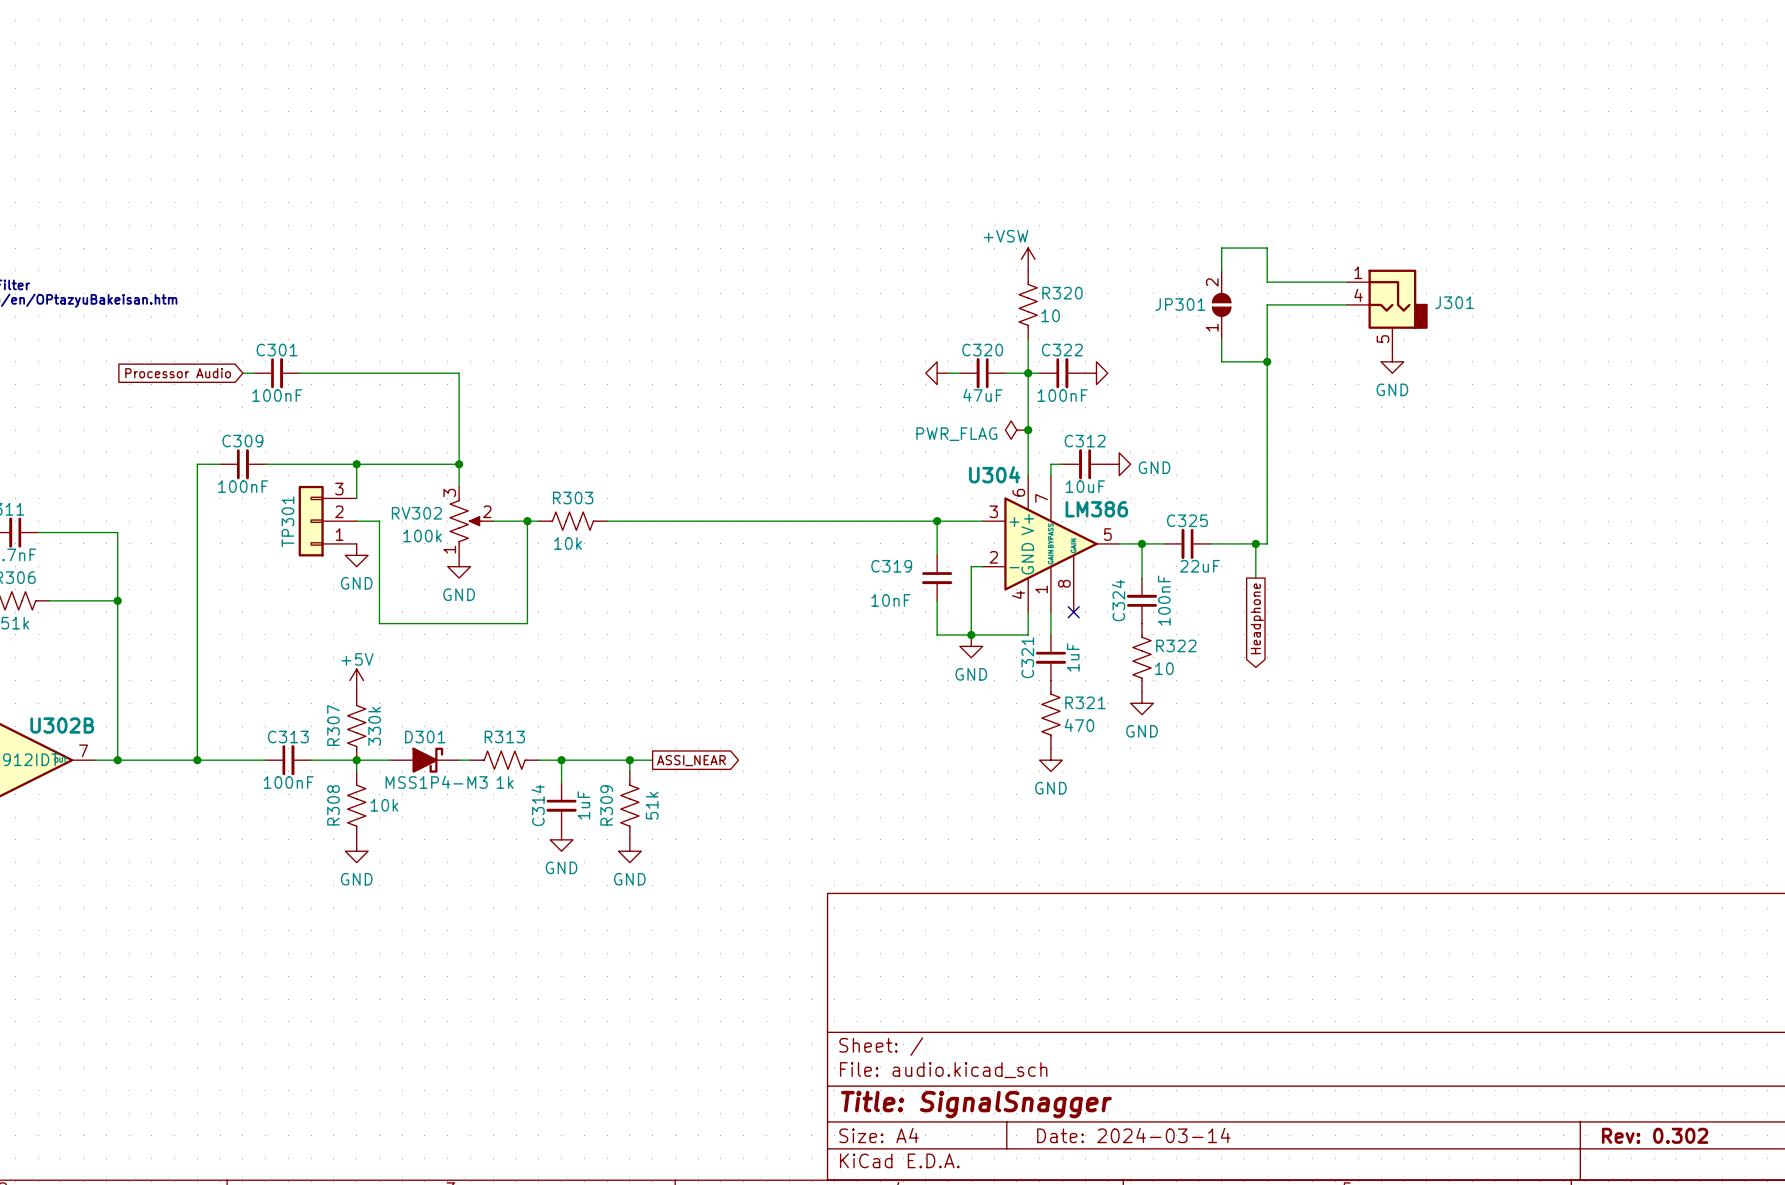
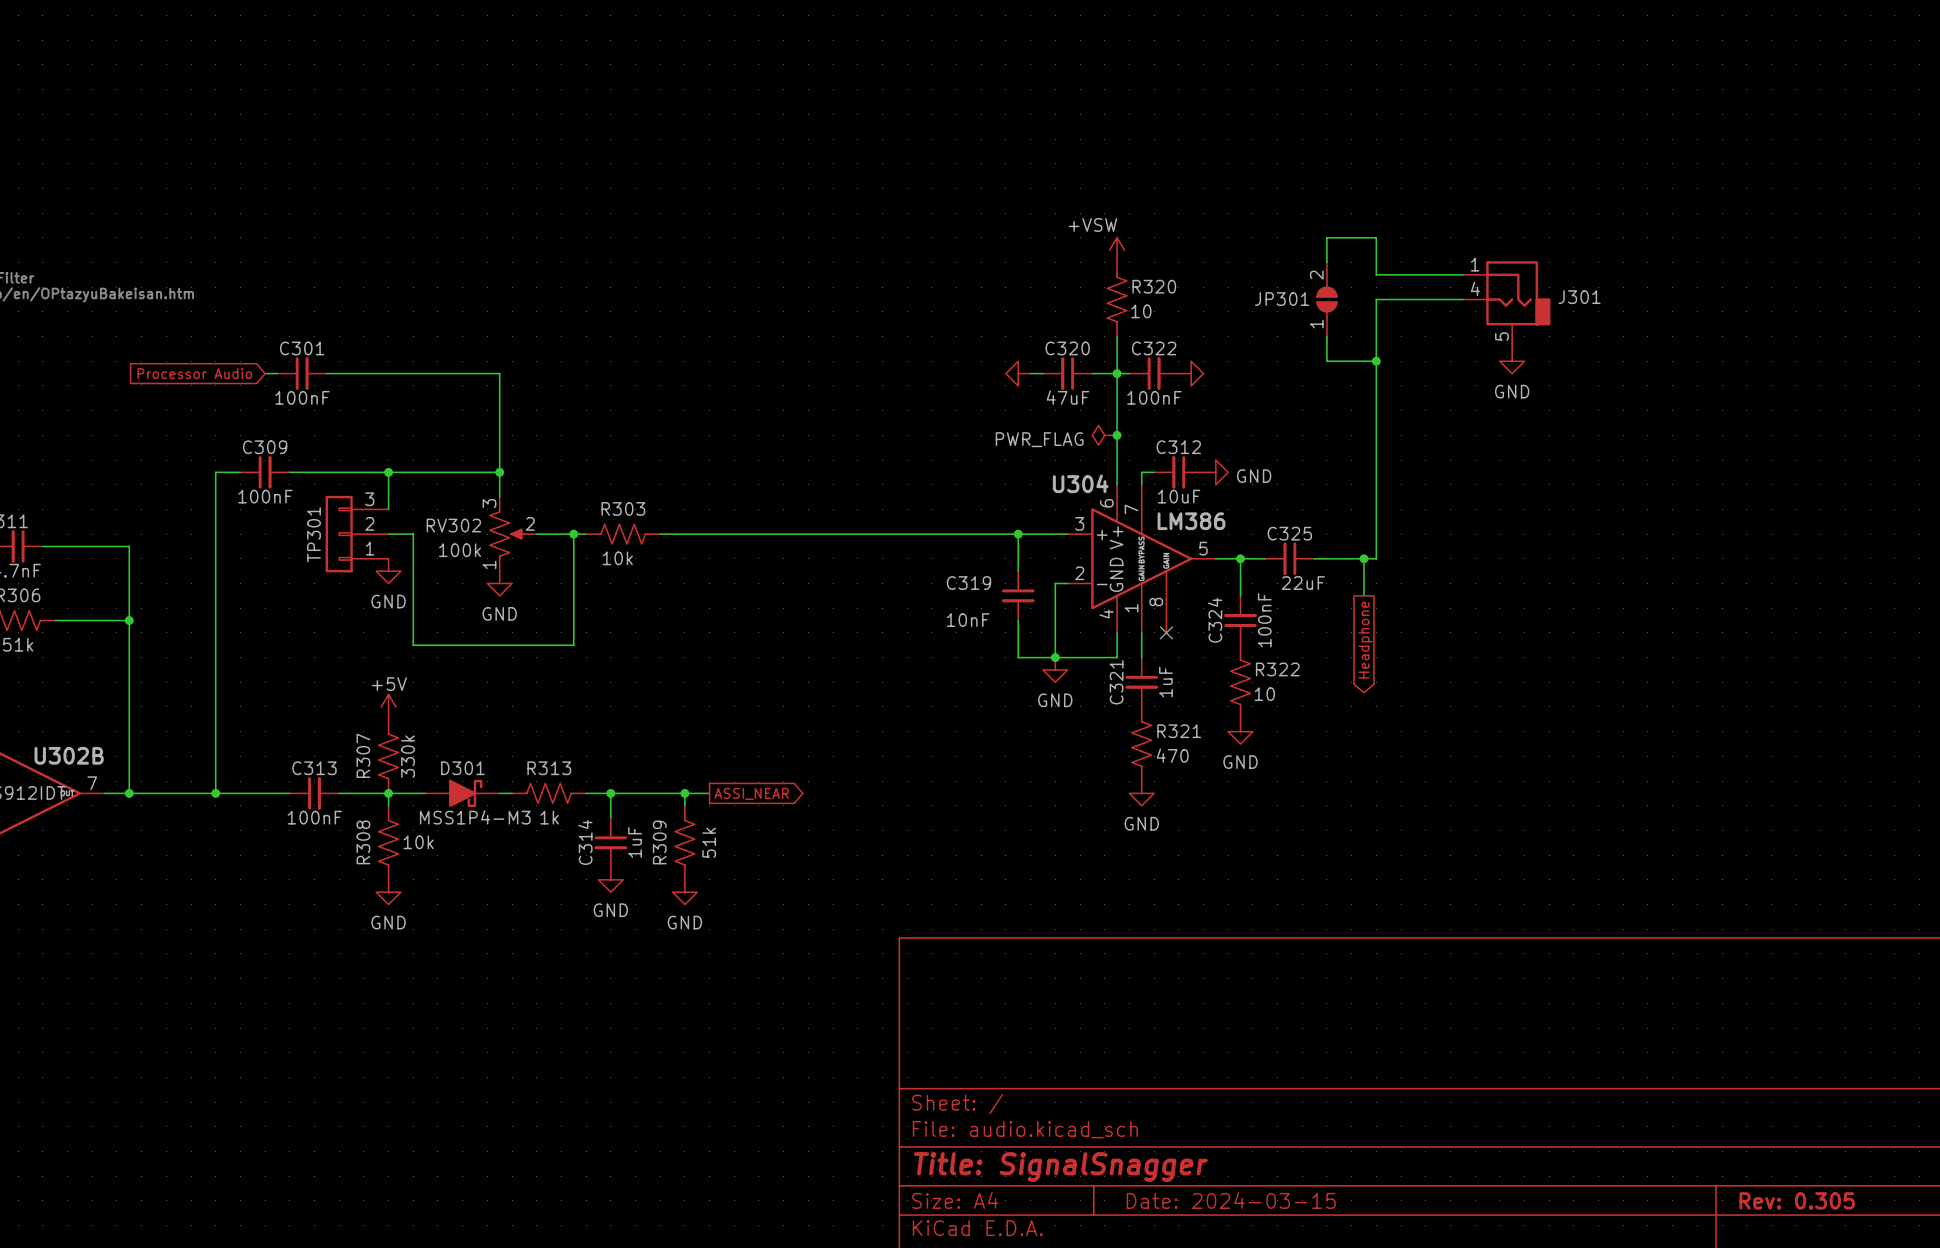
title block: Date: 2024-03-14 (1133, 1135) -> Date: 2024-03-15 (1231, 1200)
title block: Rev: 0.302 (1655, 1135) -> Rev: 0.305 (1797, 1200)

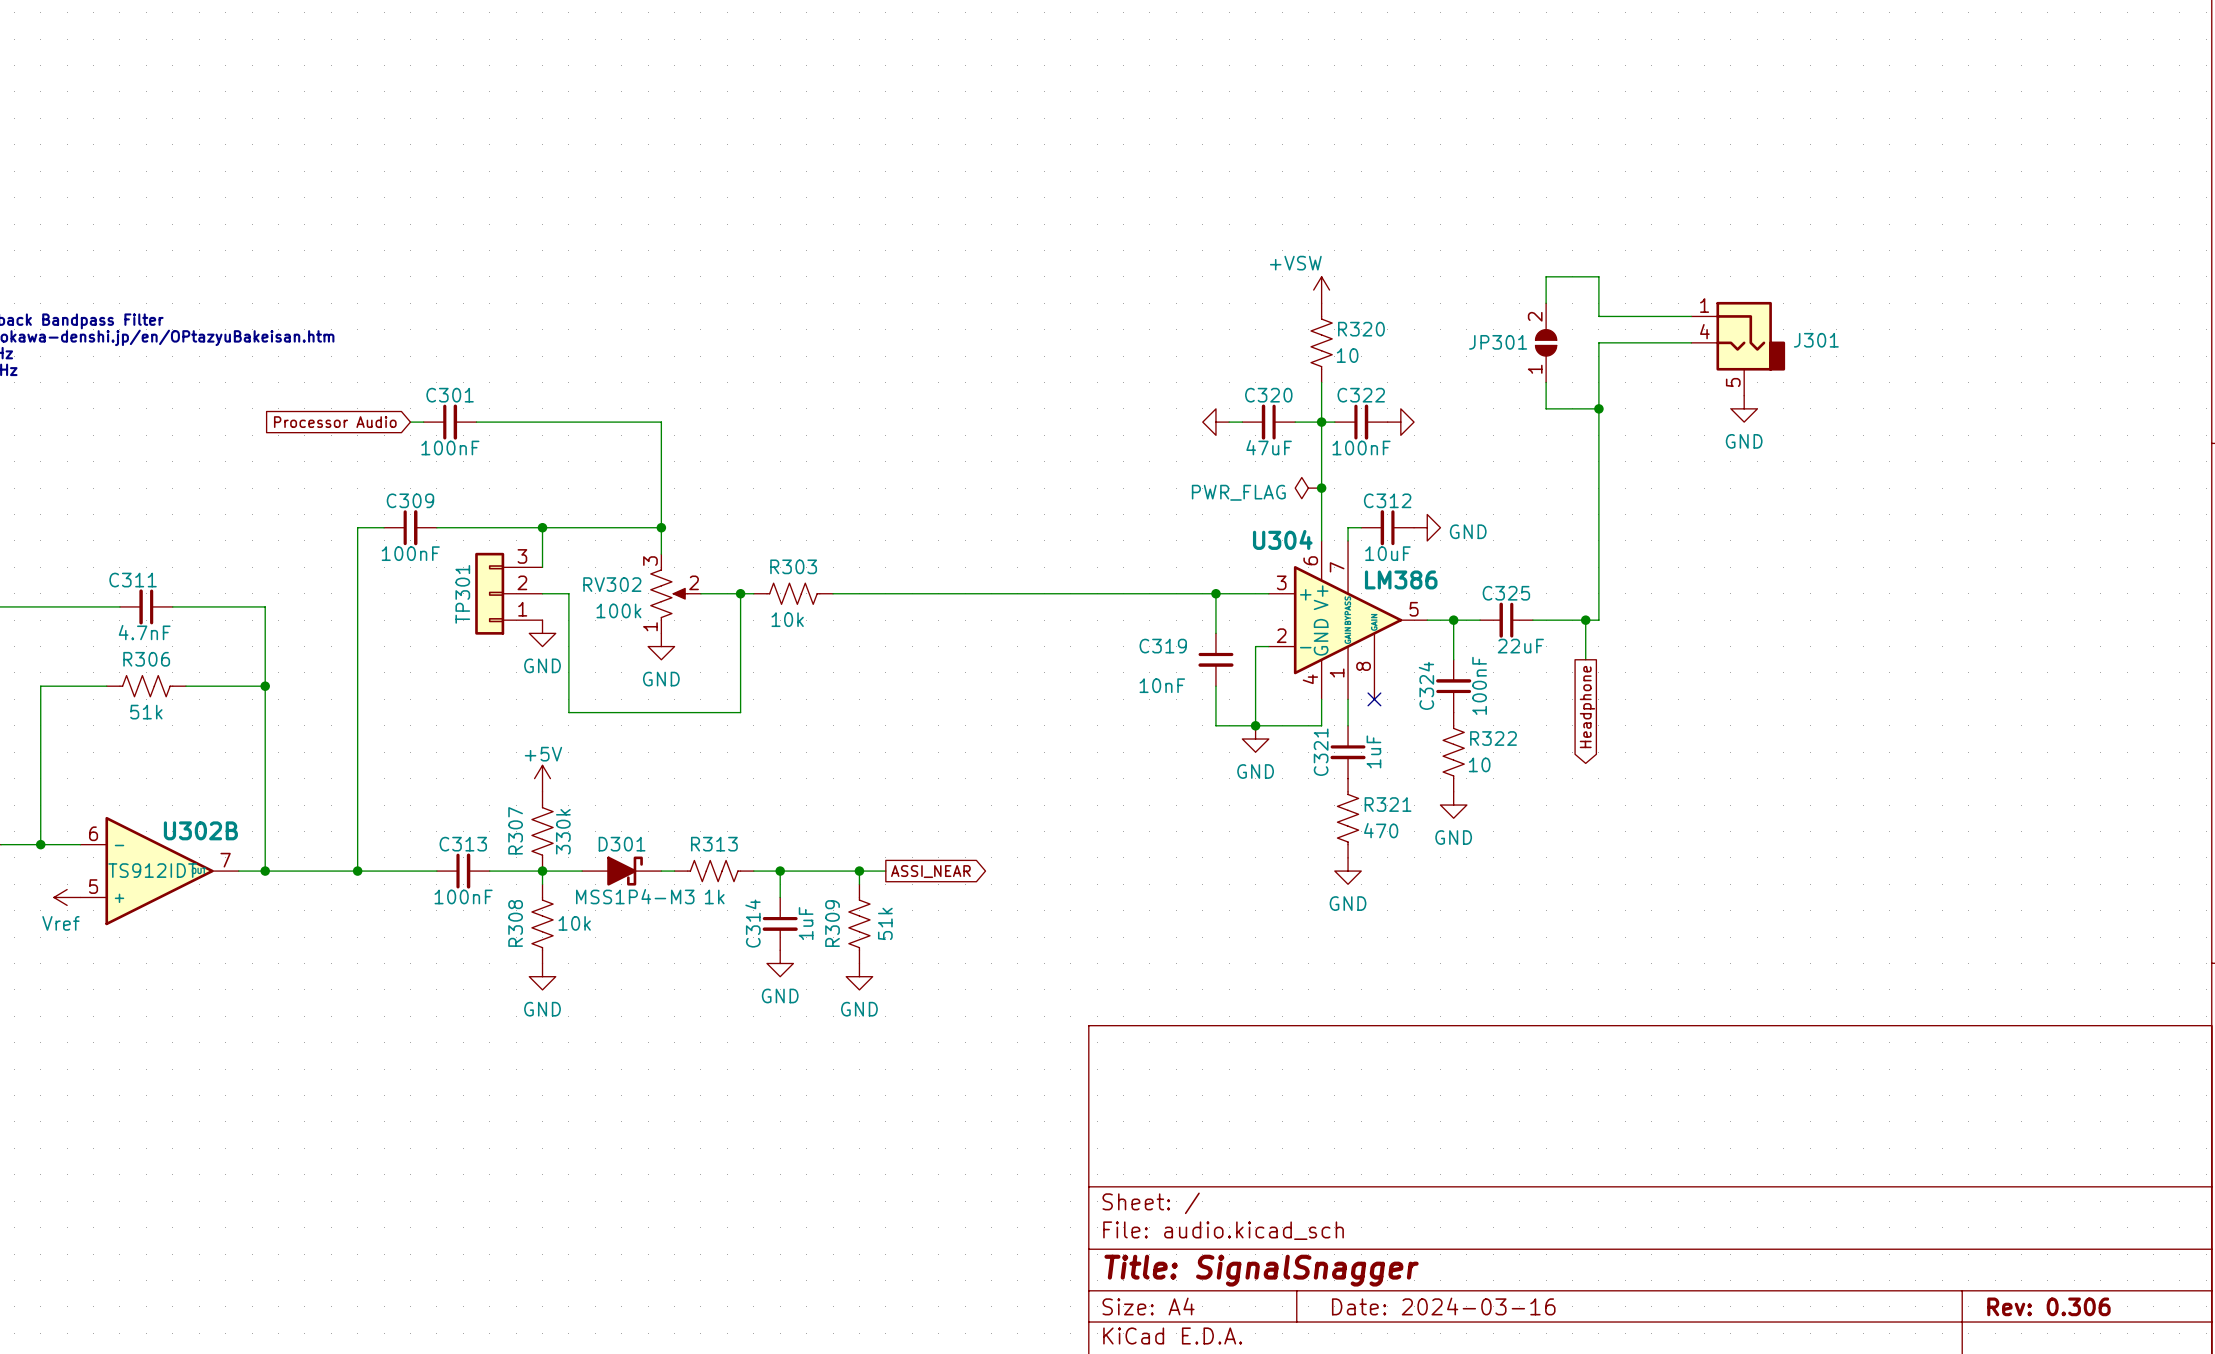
title block: Date: 2024-03-15 (1231, 1200) -> Date: 2024-03-16 (1443, 1306)
title block: Rev: 0.305 (1797, 1200) -> Rev: 0.306 (2048, 1306)

